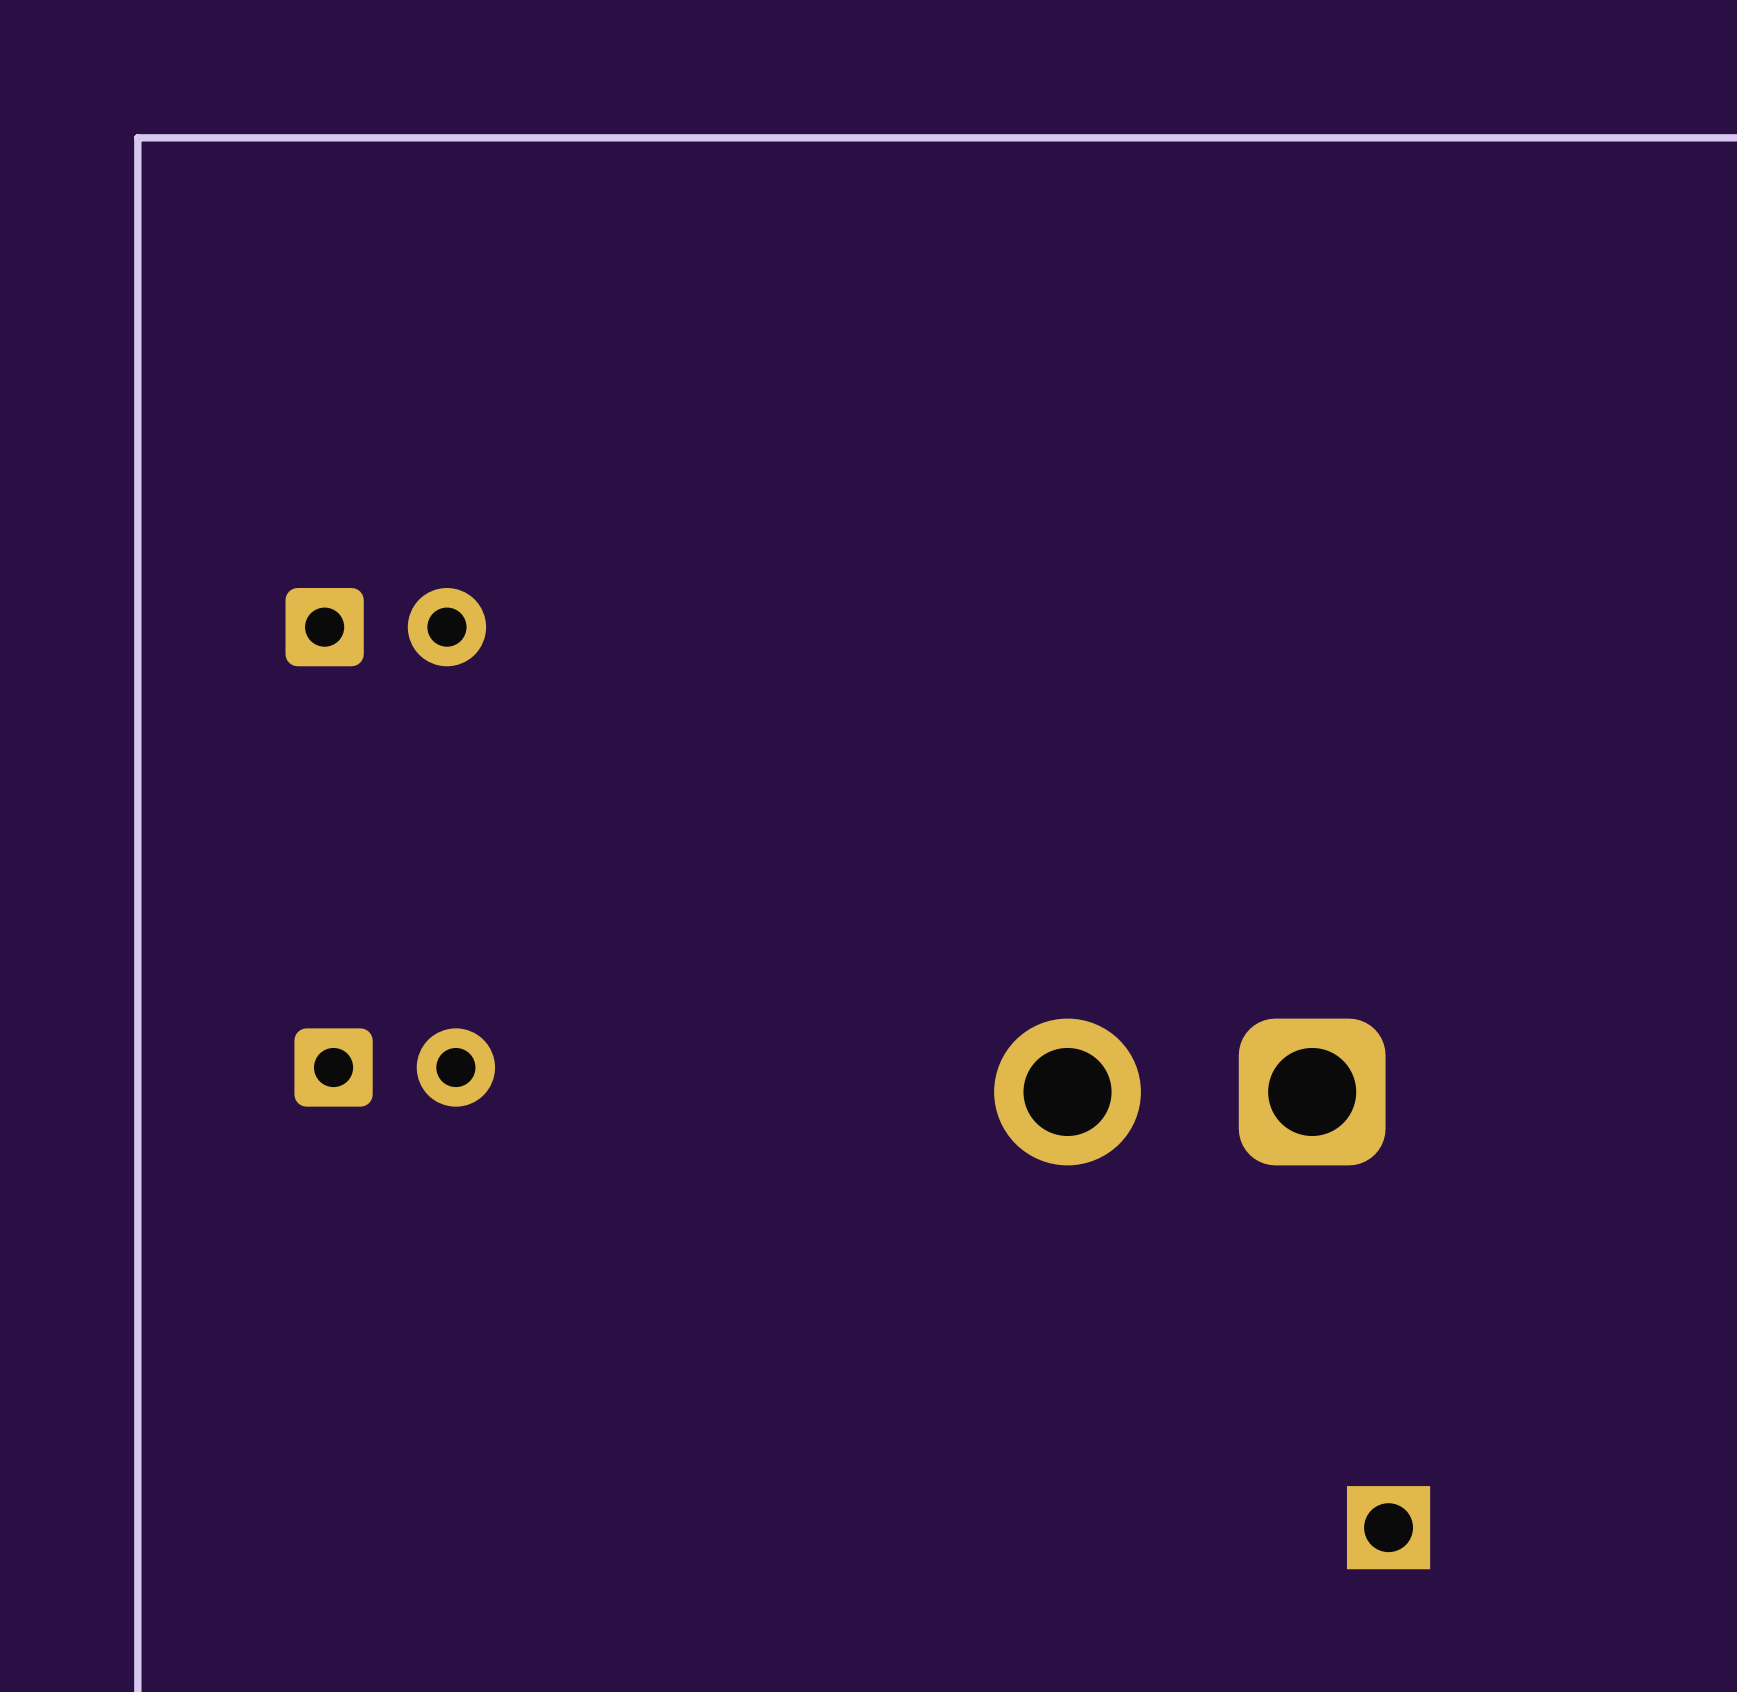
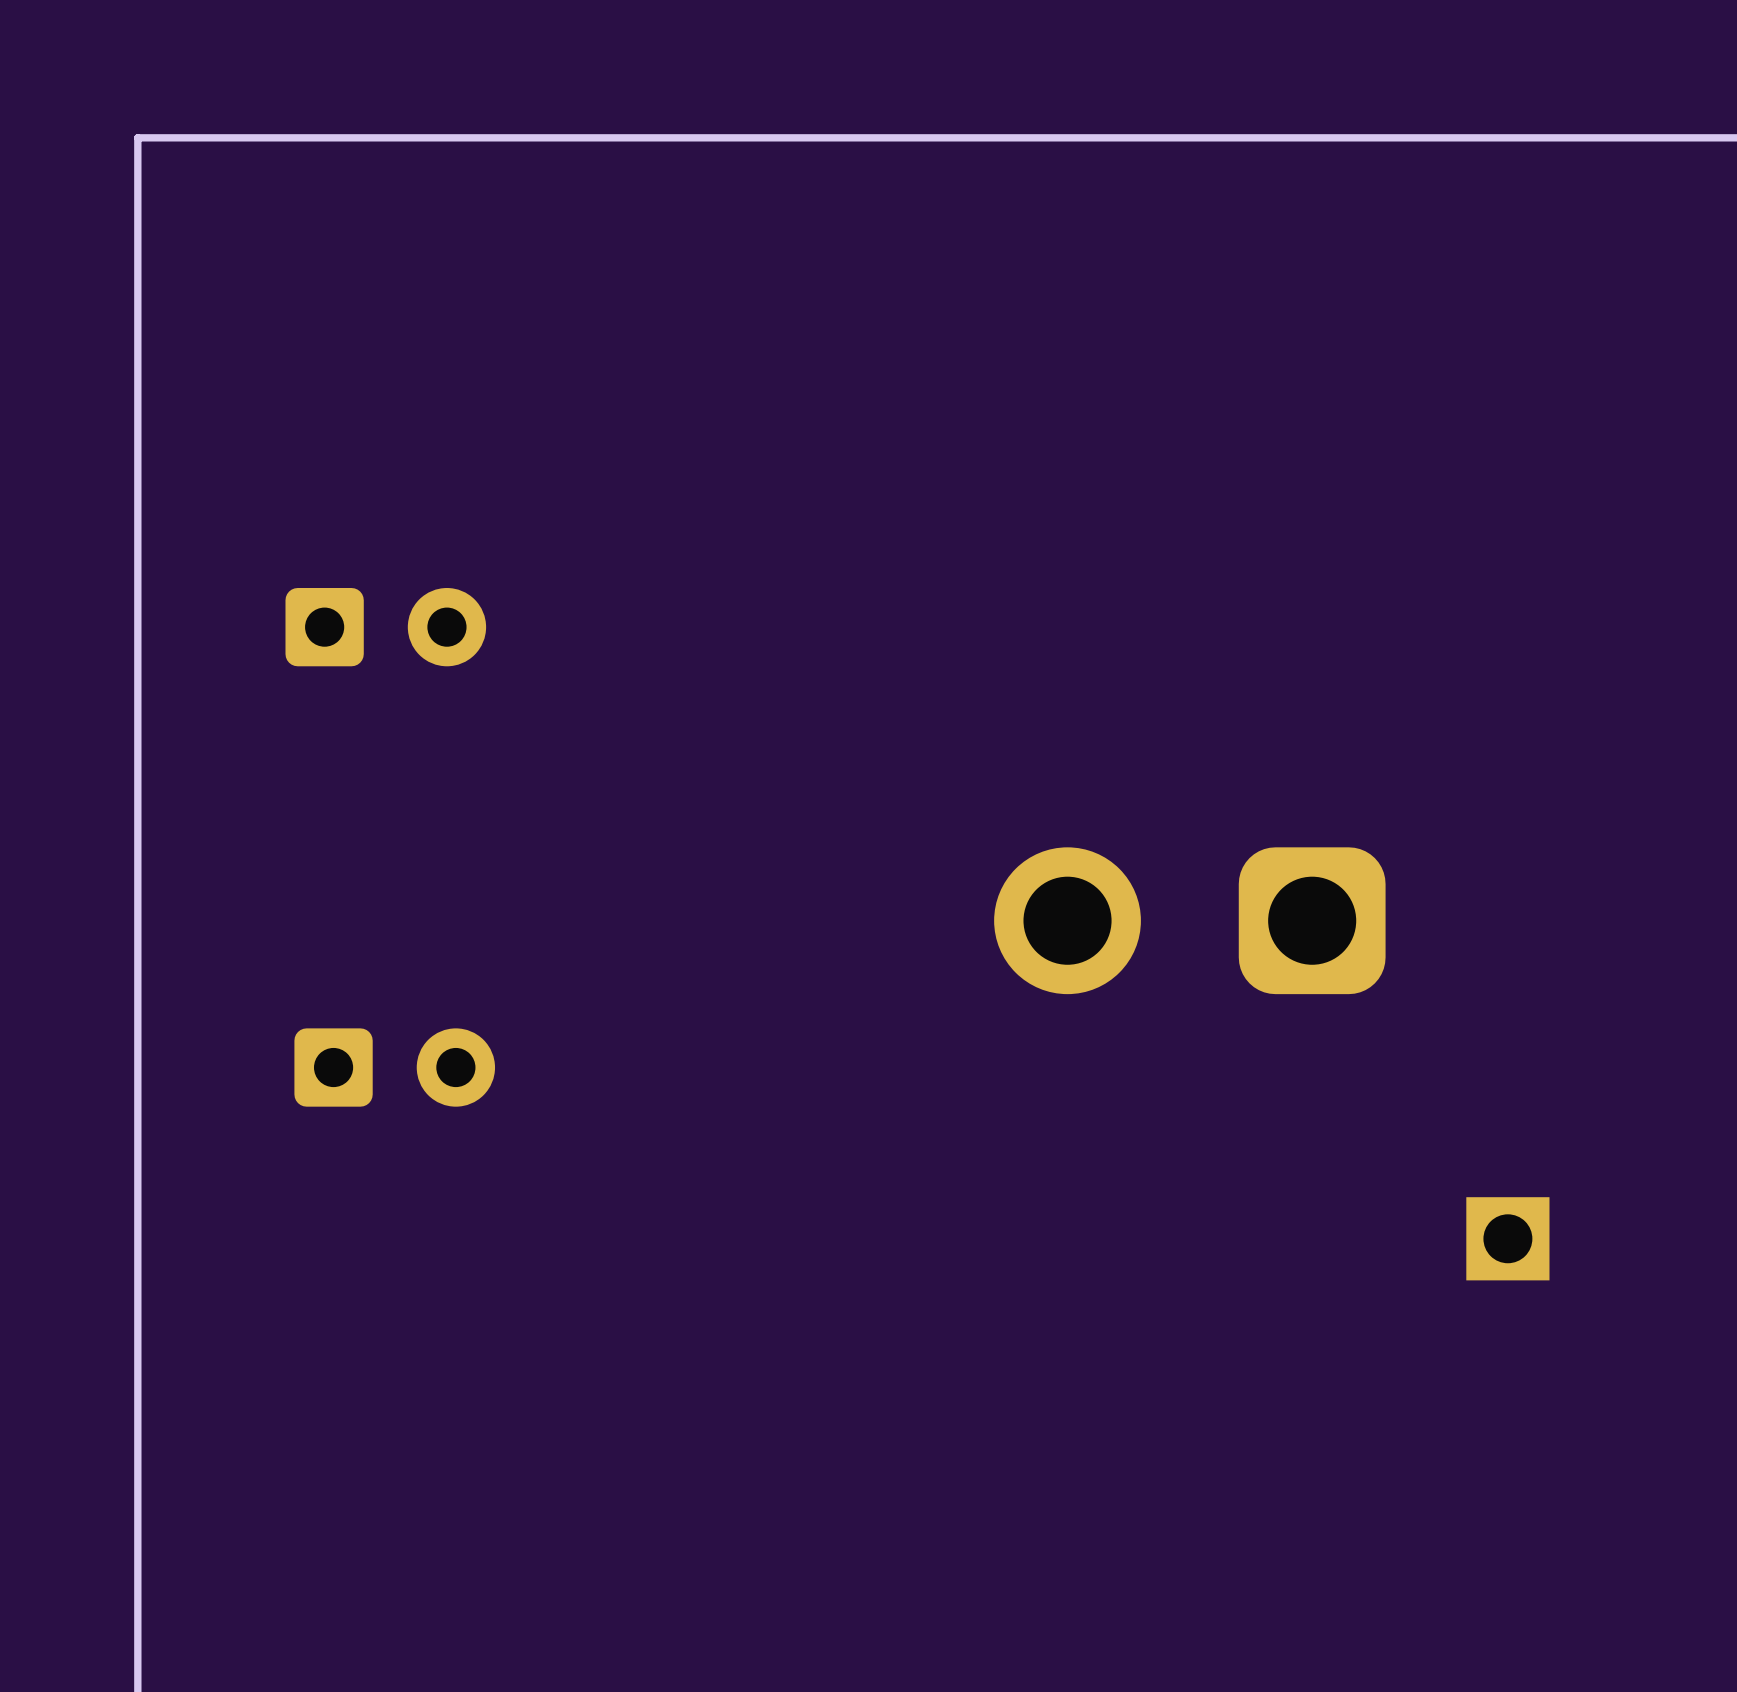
part position: (1189, 1091) -> (1189, 920)
part position: (1388, 1527) -> (1507, 1238)

